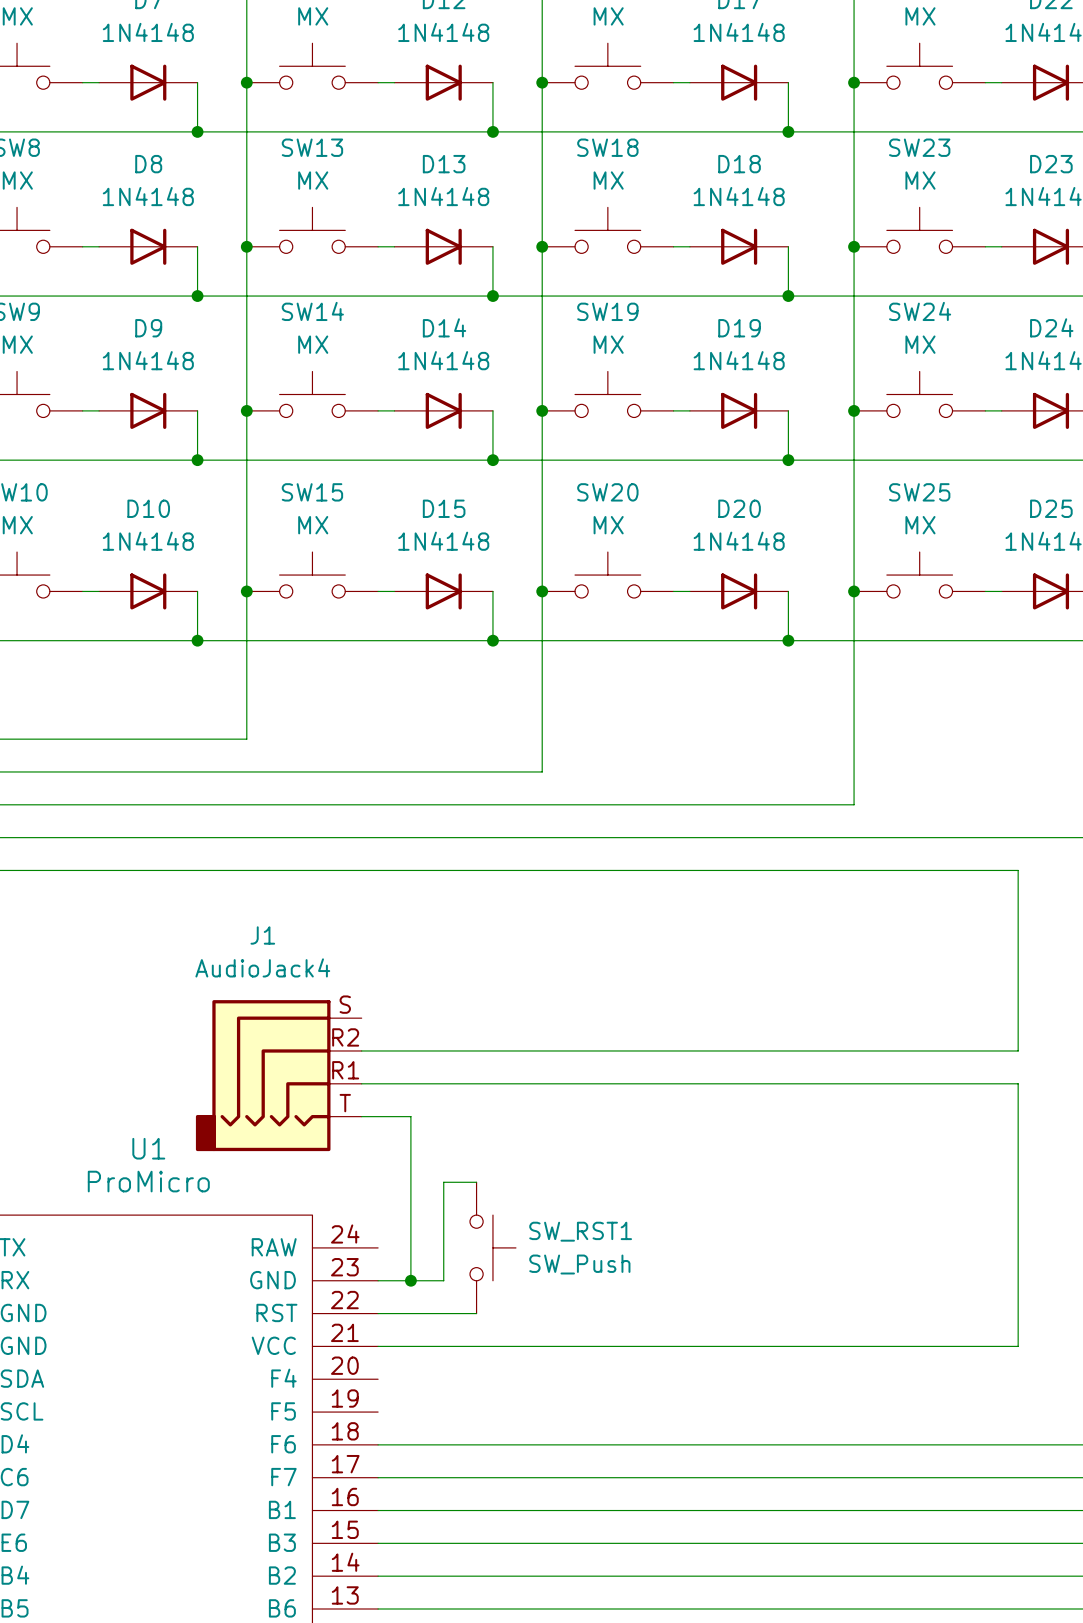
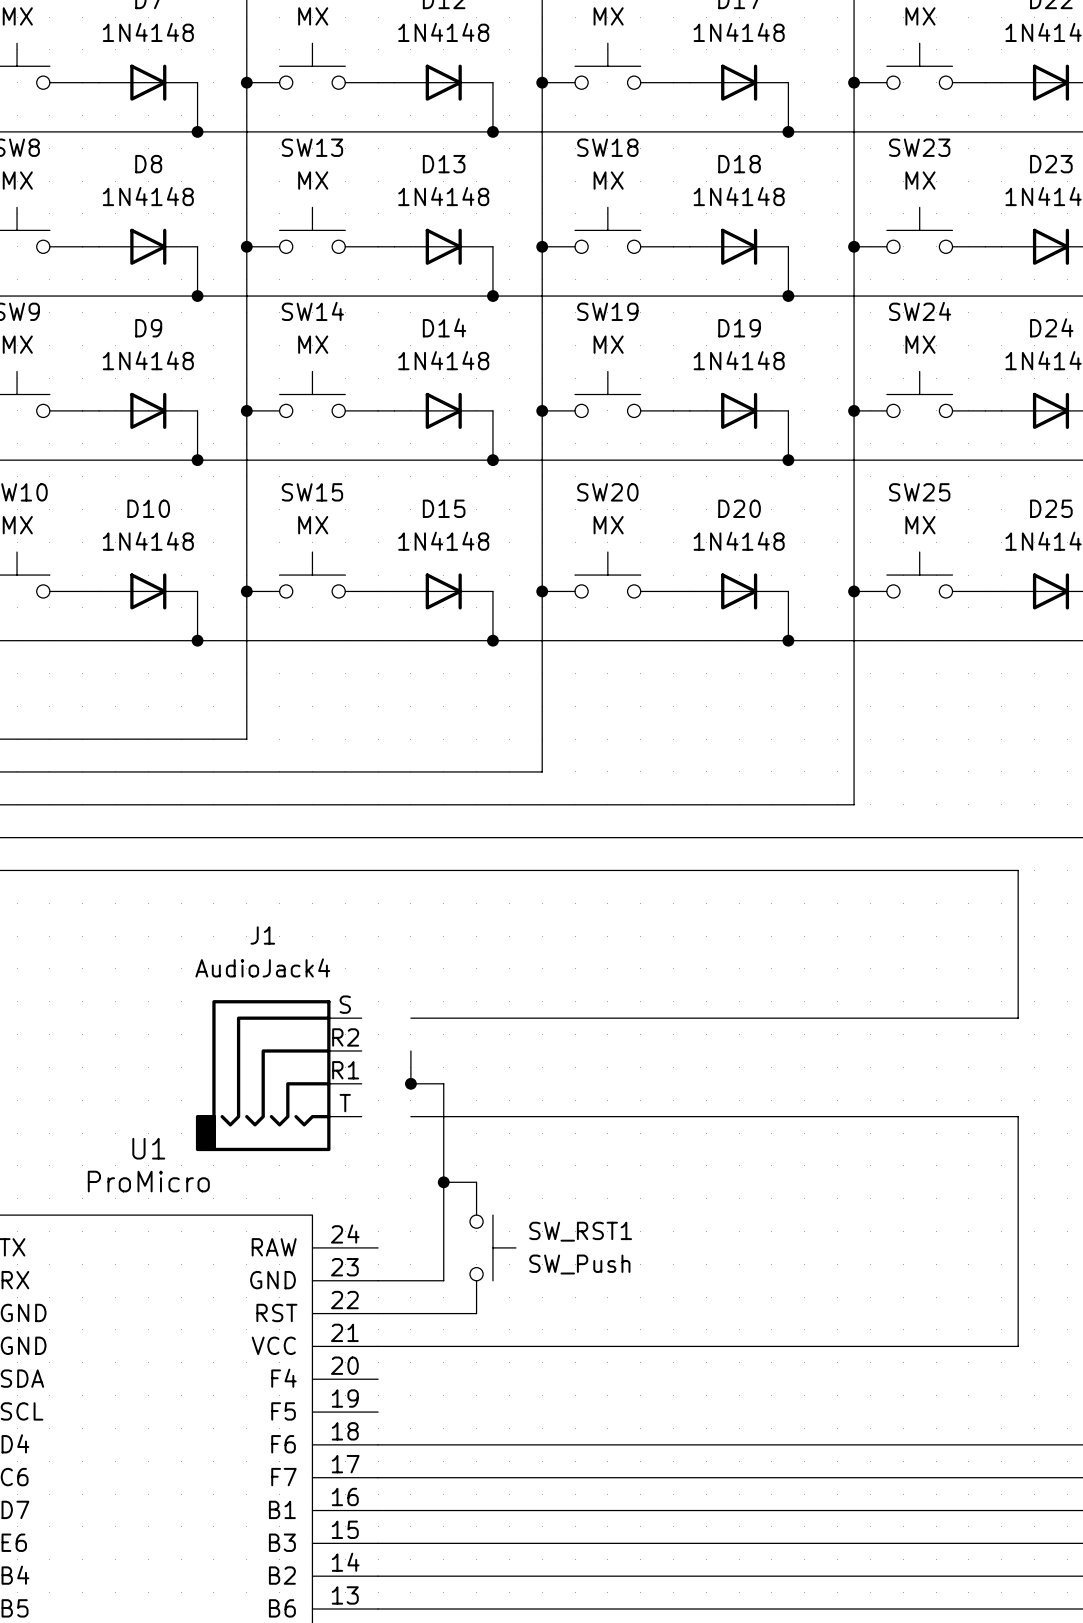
wire: (1018, 1018) (1018, 1050) (361, 1050) -> (1018, 1018) (410, 1018)
wire: (361, 1083) (410, 1083) -> (410, 1050) (410, 1083)
junction: none -> (410, 1083)
wire: (443, 1083) (1018, 1083) (1018, 1116) -> (410, 1116) (1018, 1116)
wire: none -> (443, 1083) (443, 1182)
wire: (361, 1116) (410, 1116) (410, 1280) -> none
junction: none -> (443, 1182)
junction: (410, 1280) -> none

